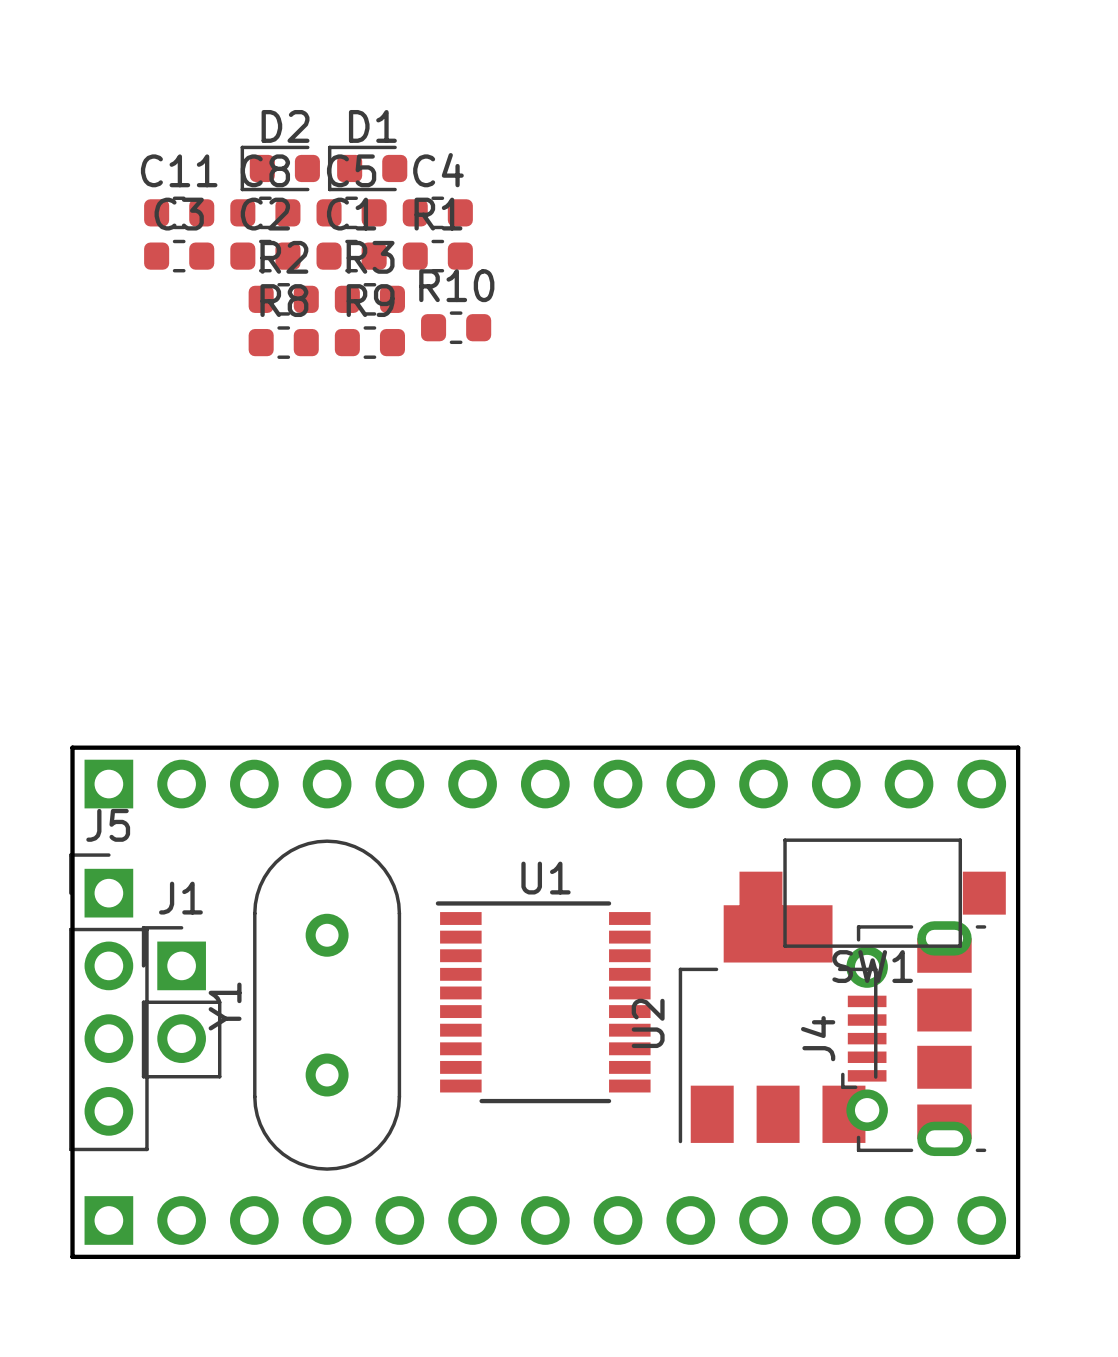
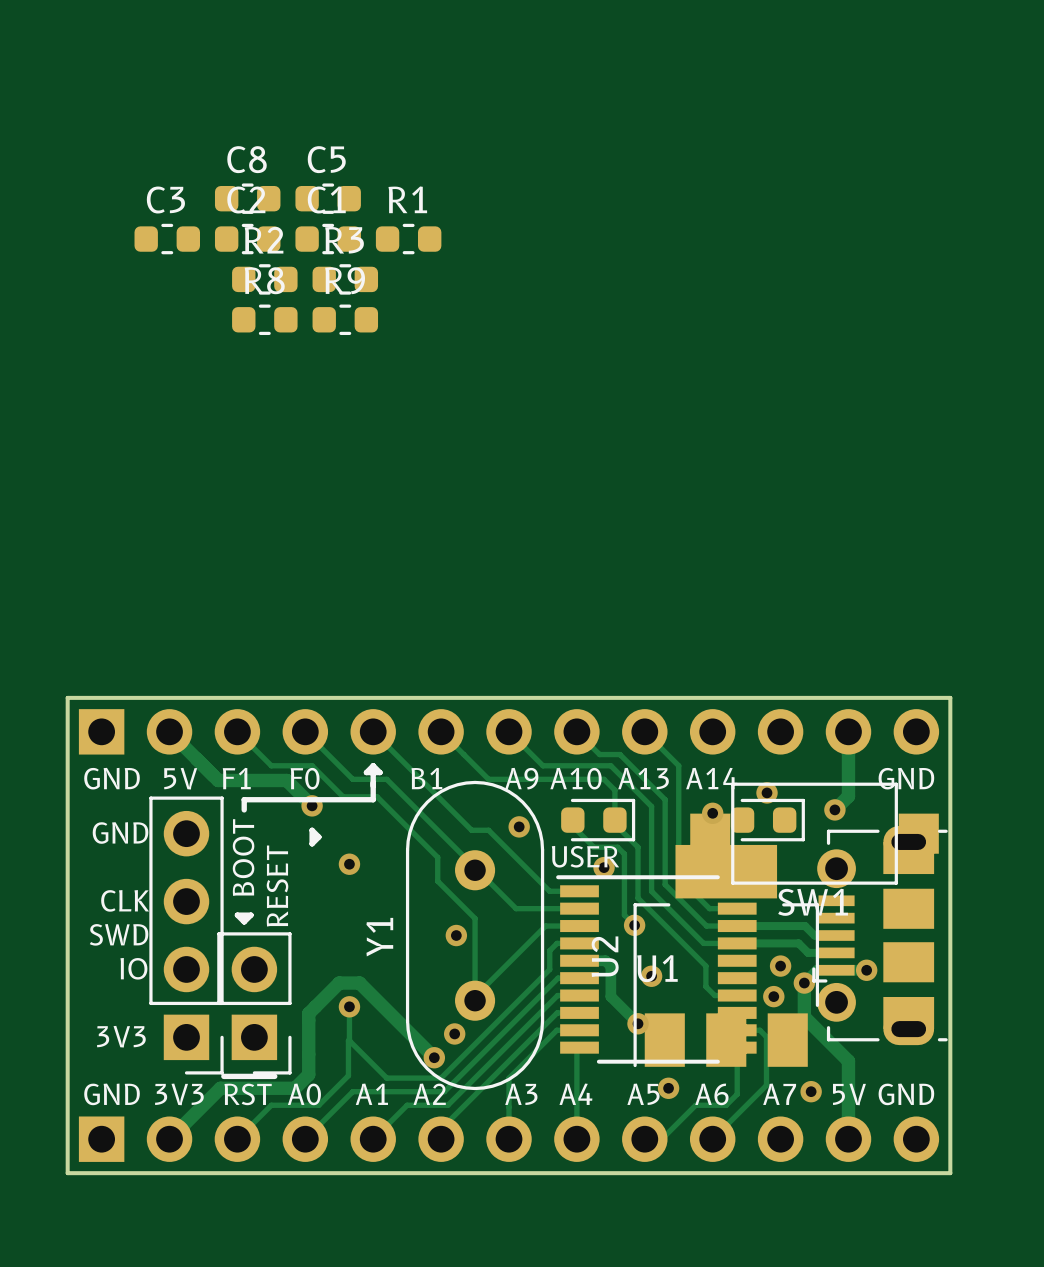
D2: (280, 168) -> none
D1: (367, 168) -> none
C11: (179, 212) -> none
C4: (437, 212) -> none
R10: (456, 327) -> none
track: none -> (169, 731) (218, 780) (286, 780) (312, 805)
track: none -> (237, 731) (271, 765) (312, 765) (343, 796) (377, 796) (437, 857) (437, 881) (475, 918) (475, 998)
track: none -> (305, 731) (352, 779) (386, 779) (516, 908) (579, 908)
track: none -> (373, 731) (471, 830) (488, 830) (549, 891) (579, 891)
track: none -> (441, 731) (488, 779) (604, 779) (614, 790) (614, 823)
track: none -> (509, 731) (542, 765) (610, 765) (651, 806) (651, 891) (703, 943) (798, 943) (808, 952) (836, 952)
track: none -> (576, 731) (599, 754) (619, 754) (665, 799) (665, 884) (706, 926) (805, 926) (814, 935) (836, 935)
track: none -> (644, 731) (678, 765) (678, 877) (709, 908) (737, 908)
track: none -> (848, 731) (848, 796) (834, 809)
line: none -> (373, 765) (373, 799) (244, 799) (244, 809)
line: none -> (373, 765) (366, 772) (380, 772) (373, 765)
text: none -> A14 (711, 778)
text: none -> GND (112, 778)
text: none -> 5V (180, 778)
text: none -> F1 (236, 778)
text: none -> F0 (305, 778)
text: none -> B1 (426, 778)
text: none -> A9 (521, 778)
text: none -> A10 (576, 778)
text: none -> A13 (643, 778)
text: none -> GND (906, 778)
via: none -> (767, 792)
via: none -> (312, 805)
via: none -> (834, 809)
via: none -> (712, 813)
U1 name position: U1 (546, 878) -> U1 (657, 968)
part: none -> (598, 820)
part: none -> (767, 820)
track: none -> (572, 823) (572, 826) (593, 847) (617, 847) (624, 854) (624, 915) (634, 925)
track: none -> (614, 823) (638, 847) (638, 898) (705, 966) (705, 986) (714, 995) (737, 995)
via: none -> (519, 826)
line: none -> (312, 830) (312, 843) (318, 837) (312, 830)
text: none -> GND (120, 832)
text: none -> BOOT (243, 857)
text: none -> USER (585, 856)
via: none -> (349, 864)
via: none -> (604, 867)
text: none -> RESET (277, 886)
text: none -> CLK (125, 900)
line: none -> (237, 915) (244, 921) (251, 915) (237, 915)
via: none -> (634, 925)
track: none -> (579, 926) (545, 926) (475, 996)
text: none -> SWD (119, 934)
J5: (108, 1002) -> none
J1: (181, 1002) -> none
part: none -> (186, 935)
via: none -> (456, 935)
U1 position: (543, 1002) -> (656, 969)
part: none -> (879, 935)
Y1 position: (327, 1005) -> (475, 935)
track: none -> (579, 943) (557, 943) (549, 950) (549, 969) (441, 1078) (386, 1078) (349, 1040) (349, 1006)
track: none -> (579, 960) (605, 960) (610, 966) (610, 996) (638, 1023)
via: none -> (780, 966)
text: none -> IO (133, 968)
J4: (913, 1038) -> none
track: none -> (866, 970) (817, 970) (804, 983) (804, 1016) (848, 1061) (848, 1139)
via: none -> (866, 970)
via: none -> (651, 976)
track: none -> (579, 978) (558, 978) (444, 1091) (352, 1091) (305, 1139)
via: none -> (804, 983)
track: none -> (579, 995) (557, 995) (447, 1105) (407, 1105) (373, 1139)
via: none -> (773, 996)
part: none -> (254, 1003)
via: none -> (349, 1006)
track: none -> (579, 1012) (557, 1012) (441, 1129) (441, 1139)
via: none -> (638, 1023)
track: none -> (579, 1030) (556, 1030) (509, 1078) (509, 1139)
track: none -> (737, 1030) (759, 1030) (766, 1036) (766, 1085) (712, 1139)
via: none -> (454, 1033)
text: none -> 3V3 (121, 1036)
track: none -> (349, 1039) (348, 1075) (318, 1105) (271, 1105) (237, 1139)
track: none -> (579, 1047) (576, 1050) (576, 1139)
track: none -> (737, 1047) (737, 1094) (726, 1105) (695, 1105) (661, 1139) (644, 1139)
track: none -> (434, 1057) (359, 983) (339, 983) (308, 1013) (308, 1074) (295, 1088) (220, 1088) (169, 1139)
via: none -> (434, 1057)
line: none -> (223, 1076) (274, 1076)
via: none -> (668, 1088)
via: none -> (811, 1091)
text: none -> A4 (575, 1094)
text: none -> GND (112, 1094)
text: none -> 3V3 (179, 1094)
text: none -> RST (248, 1094)
text: none -> A0 (304, 1094)
text: none -> A1 (371, 1094)
text: none -> A2 (429, 1094)
text: none -> A3 (521, 1094)
text: none -> A5 (643, 1094)
text: none -> A6 (711, 1094)
text: none -> A7 (779, 1094)
text: none -> 5V (849, 1094)
text: none -> GND (906, 1094)

